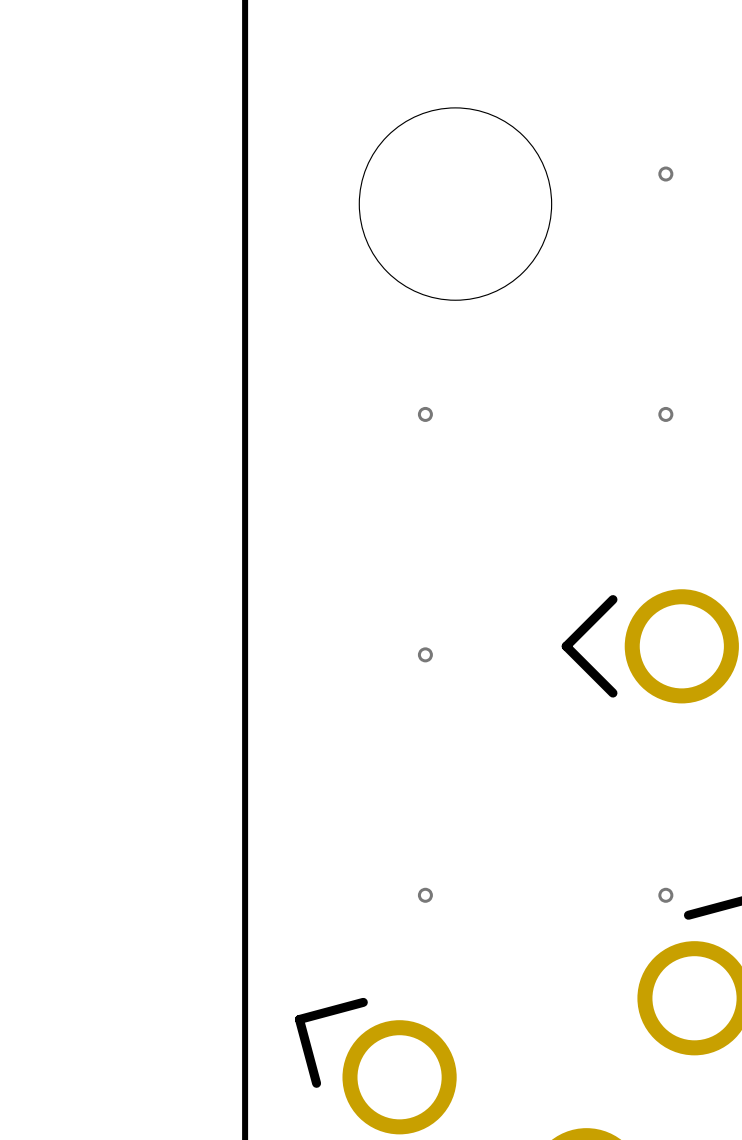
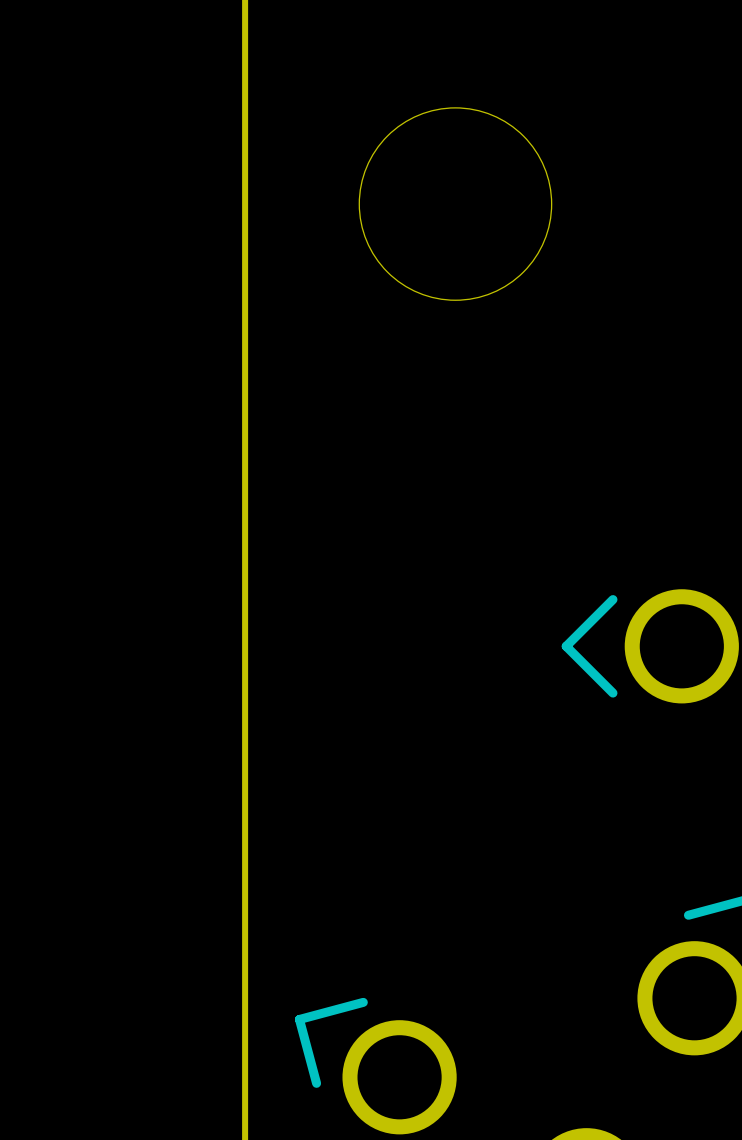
via: (665, 174) -> none
via: (425, 414) -> none
via: (665, 414) -> none
via: (425, 654) -> none
via: (425, 895) -> none
via: (665, 895) -> none

